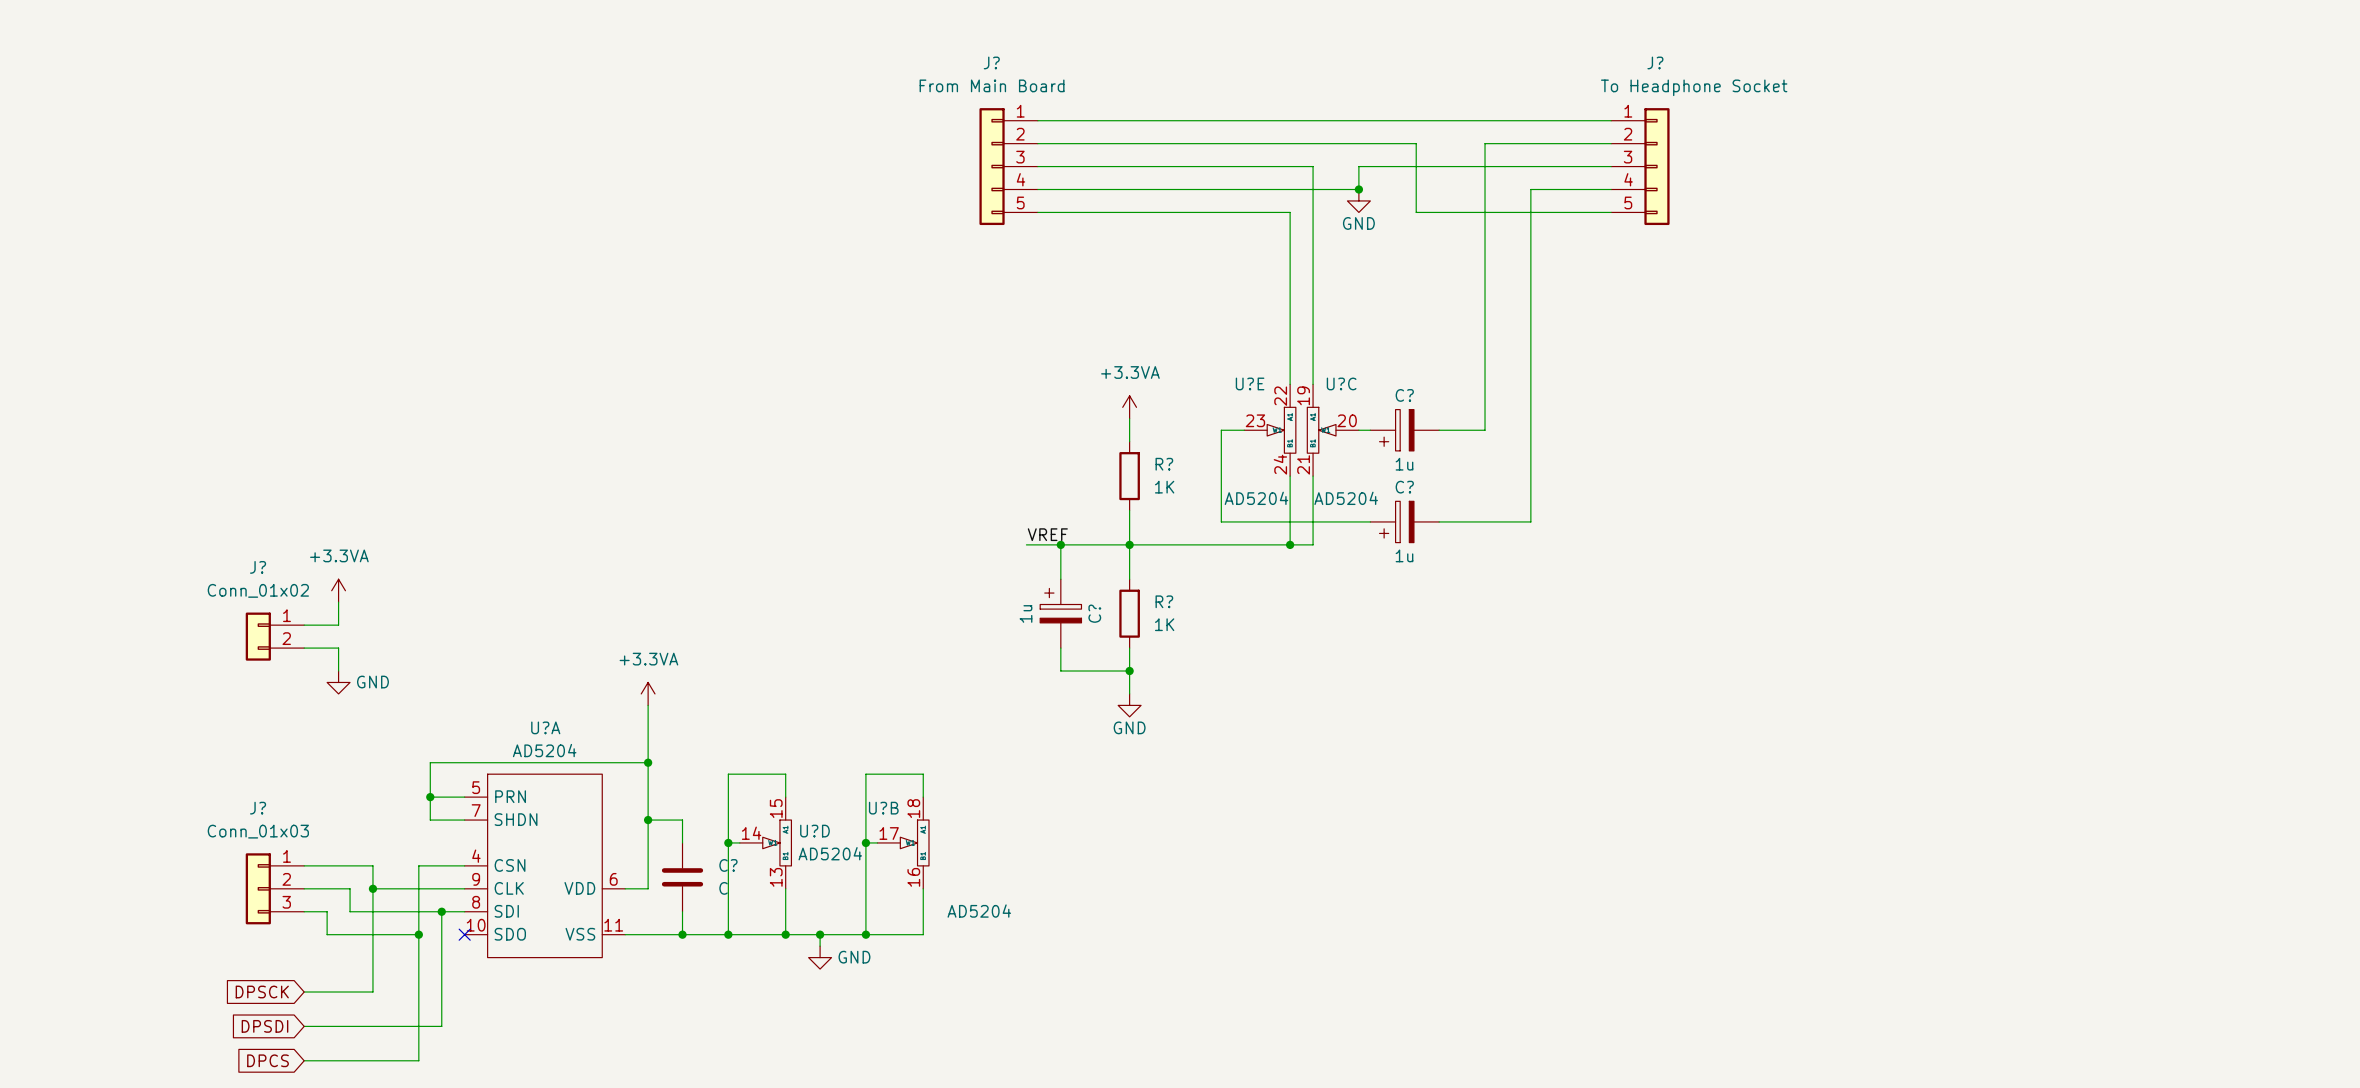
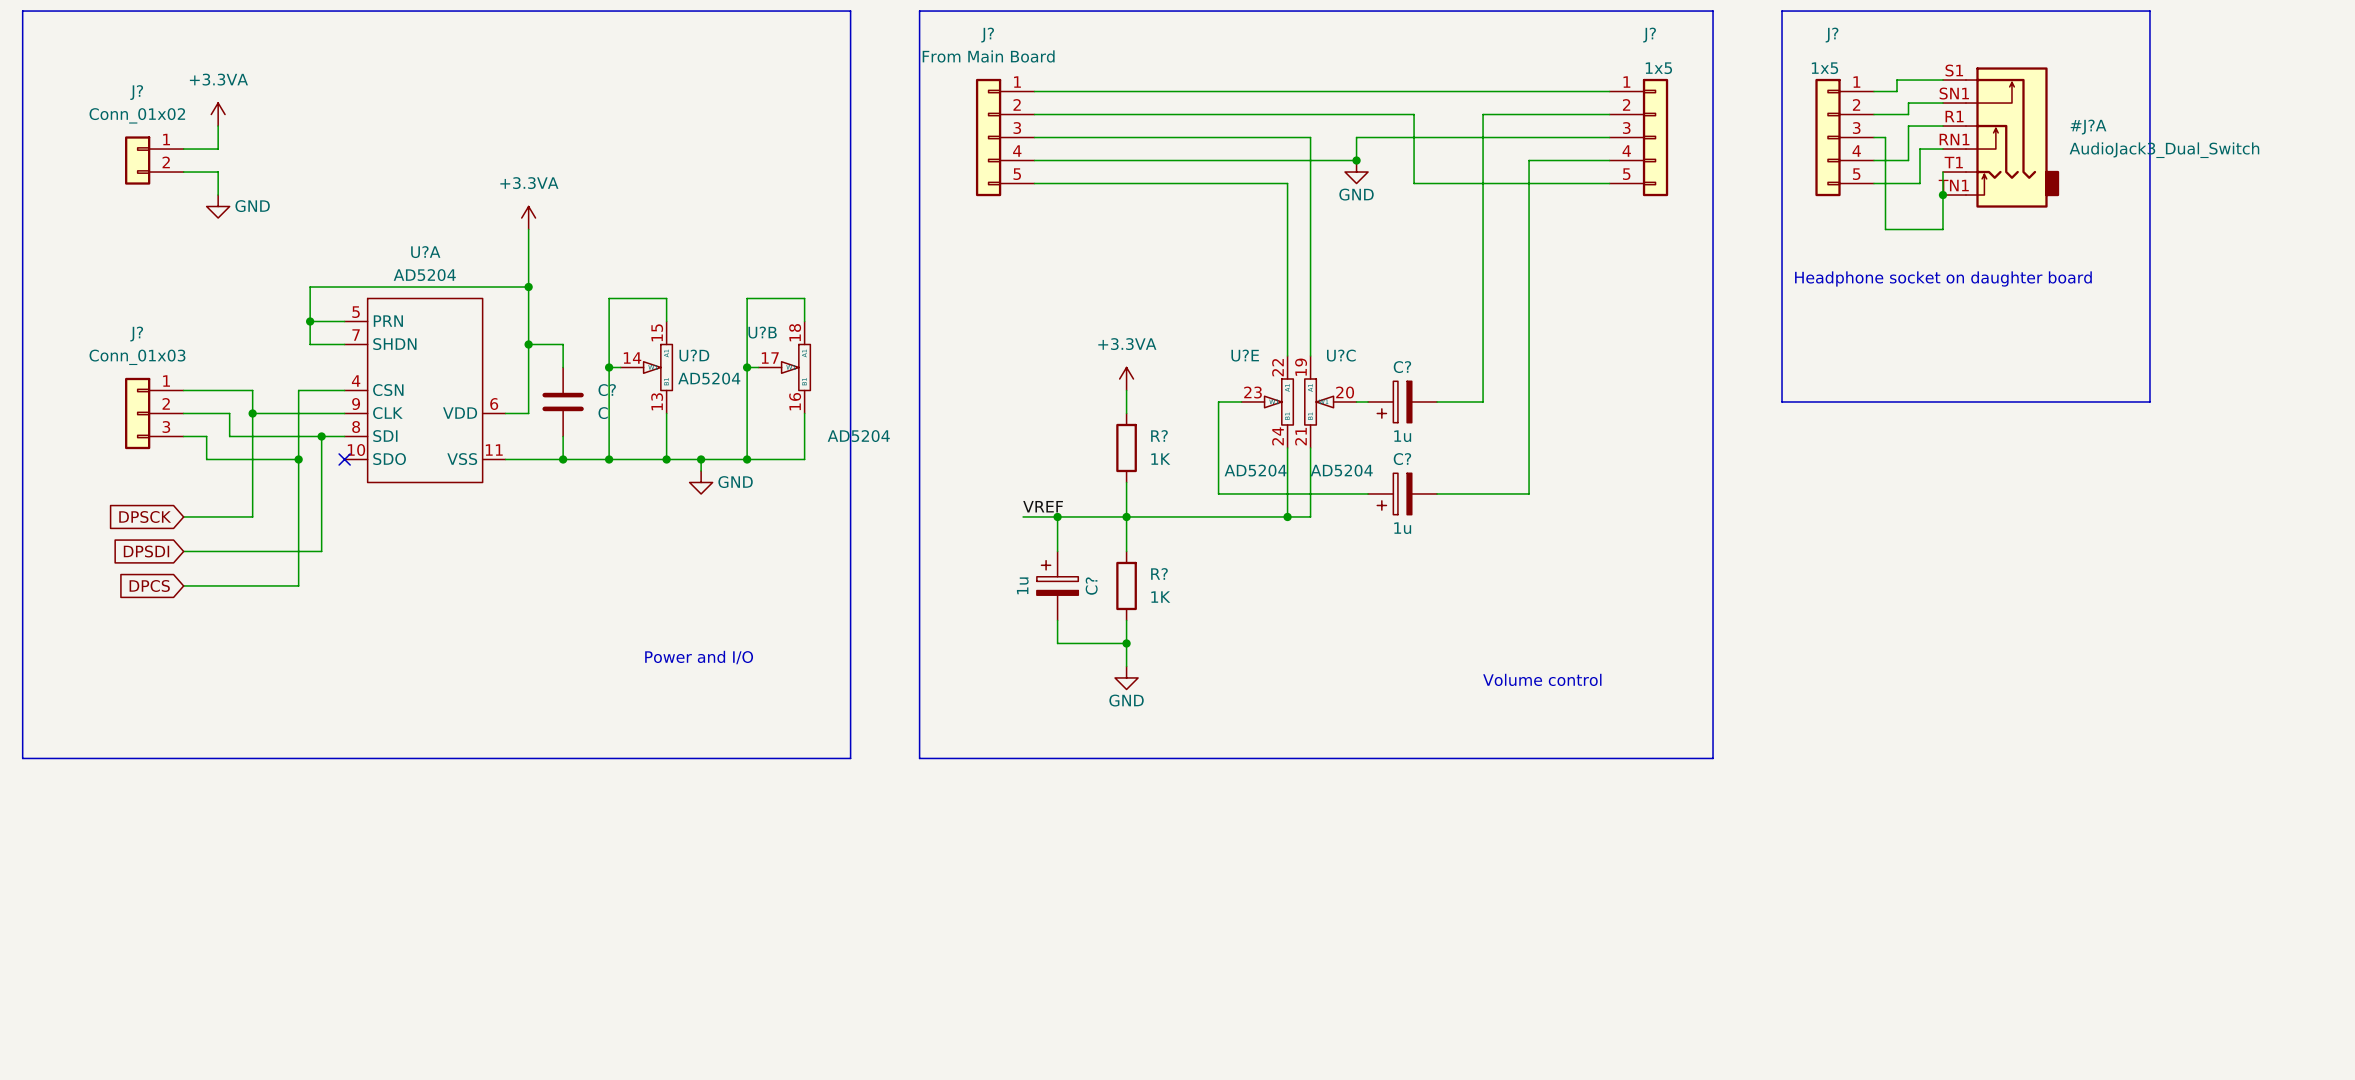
line: none -> (22, 11) (22, 758) (850, 758) (850, 11) (22, 11)
line: none -> (919, 11) (1713, 11) (1713, 758) (919, 758) (919, 11)
line: none -> (1782, 11) (2149, 11) (2149, 401) (1782, 401) (1782, 11)
J? value: To Headphone Socket (1694, 87) -> 1x5 (1658, 68)
wire: none -> (1942, 80) (1897, 80) (1897, 91) (1874, 91)
wire: none -> (1942, 103) (1908, 103) (1908, 114) (1874, 114)
power symbol: none -> +3.3VA (218, 114)
wire: none -> (218, 126) (218, 149) (183, 149)
wire: none -> (1942, 126) (1908, 126) (1908, 160) (1874, 160)
J?: none -> 1x5 (1844, 137)
wire: none -> (1874, 137) (1885, 137) (1885, 229) (1942, 229) (1942, 172)
#J?A: none -> AudioJack3_Dual_Switch (2001, 137)
wire: none -> (1942, 149) (1920, 149) (1920, 183) (1874, 183)
J?: none -> Conn_01x02 (154, 160)
wire: none -> (183, 172) (218, 172) (218, 195)
junction: none -> (1942, 195)
power symbol: none -> GND (218, 206)
power symbol: none -> +3.3VA (528, 218)
wire: none -> (528, 229) (528, 413) (505, 413)
text: none -> Headphone socket on daughter board (1943, 278)
wire: none -> (528, 287) (310, 287) (310, 344) (344, 344)
junction: none -> (528, 287)
wire: none -> (310, 321) (344, 321)
junction: none -> (310, 321)
wire: none -> (666, 321) (666, 298) (609, 298) (609, 459)
wire: none -> (804, 321) (804, 298) (747, 298) (747, 459)
wire: none -> (528, 344) (563, 344) (563, 367)
junction: none -> (528, 344)
wire: none -> (609, 367) (620, 367)
junction: none -> (609, 367)
U?D: none -> AD5204 (646, 367)
wire: none -> (747, 367) (758, 367)
junction: none -> (747, 367)
U?B: none -> AD5204 (784, 367)
wire: none -> (183, 390) (252, 390) (252, 516) (183, 516)
wire: none -> (344, 390) (298, 390) (298, 585) (183, 585)
U?A: none -> AD5204 (425, 390)
C?: none -> C (563, 401)
J?: none -> Conn_01x03 (154, 413)
wire: none -> (183, 413) (229, 413) (229, 436) (344, 436)
wire: none -> (252, 413) (344, 413)
junction: none -> (252, 413)
wire: none -> (666, 413) (666, 459)
wire: none -> (804, 413) (804, 459) (505, 459)
wire: none -> (183, 436) (206, 436) (206, 459) (298, 459)
wire: none -> (321, 436) (321, 551) (183, 551)
junction: none -> (321, 436)
wire: none -> (563, 436) (563, 459)
junction: none -> (298, 459)
no-connect mark: none -> (344, 459)
junction: none -> (563, 459)
junction: none -> (609, 459)
junction: none -> (666, 459)
wire: none -> (701, 459) (701, 470)
junction: none -> (701, 459)
junction: none -> (747, 459)
power symbol: none -> GND (701, 482)
global label: none -> DPSCK (145, 516)
global label: none -> DPSDI (146, 551)
power symbol: +3.3VA (338, 590) -> none
wire: (338, 602) (338, 625) (304, 625) -> none
global label: none -> DPCS (149, 585)
J?: Conn_01x02 (274, 636) -> none
wire: (304, 648) (338, 648) (338, 671) -> none
power symbol: GND (338, 682) -> none
text: none -> Power and I/O (699, 657)
power symbol: +3.3VA (648, 693) -> none
wire: (648, 705) (648, 888) (625, 888) -> none
text: none -> Volume control (1542, 679)
wire: (648, 762) (430, 762) (430, 820) (464, 820) -> none
junction: (648, 762) -> none
wire: (430, 797) (464, 797) -> none
junction: (430, 797) -> none
wire: (785, 797) (785, 774) (728, 774) (728, 934) -> none
wire: (923, 797) (923, 774) (865, 774) (865, 934) -> none
wire: (648, 820) (682, 820) (682, 842) -> none
junction: (648, 820) -> none
wire: (728, 842) (739, 842) -> none
junction: (728, 842) -> none
U?D: AD5204 (765, 842) -> none
wire: (865, 842) (877, 842) -> none
junction: (865, 842) -> none
U?B: AD5204 (903, 842) -> none
wire: (304, 865) (372, 865) (372, 992) (304, 992) -> none
wire: (464, 865) (418, 865) (418, 1060) (304, 1060) -> none
U?A: AD5204 (544, 865) -> none
C?: C (682, 877) -> none
J?: Conn_01x03 (274, 888) -> none
wire: (304, 888) (350, 888) (350, 911) (464, 911) -> none
wire: (372, 888) (464, 888) -> none
junction: (372, 888) -> none
wire: (785, 888) (785, 934) -> none
wire: (923, 888) (923, 934) (625, 934) -> none
wire: (304, 911) (327, 911) (327, 934) (418, 934) -> none
wire: (441, 911) (441, 1026) (304, 1026) -> none
junction: (441, 911) -> none
wire: (682, 911) (682, 934) -> none
junction: (418, 934) -> none
no-connect mark: (464, 934) -> none
junction: (682, 934) -> none
junction: (728, 934) -> none
junction: (785, 934) -> none
wire: (820, 934) (820, 946) -> none
junction: (820, 934) -> none
junction: (865, 934) -> none
power symbol: GND (820, 957) -> none
global label: DPSCK (262, 992) -> none
global label: DPSDI (265, 1026) -> none
global label: DPCS (268, 1060) -> none

